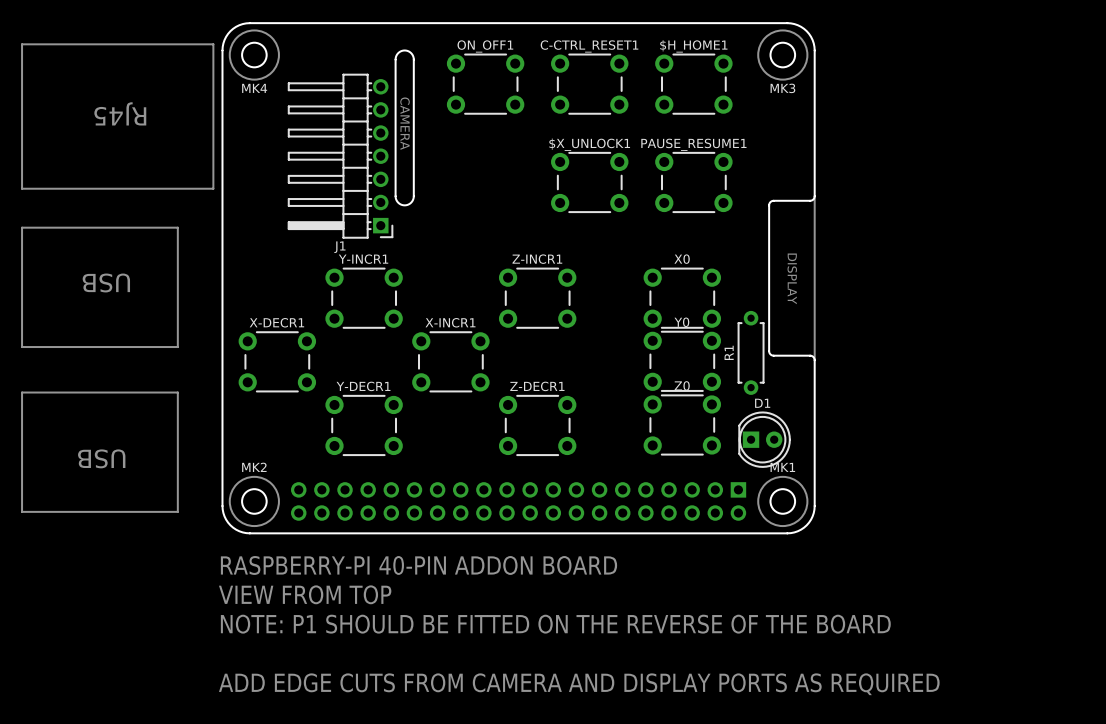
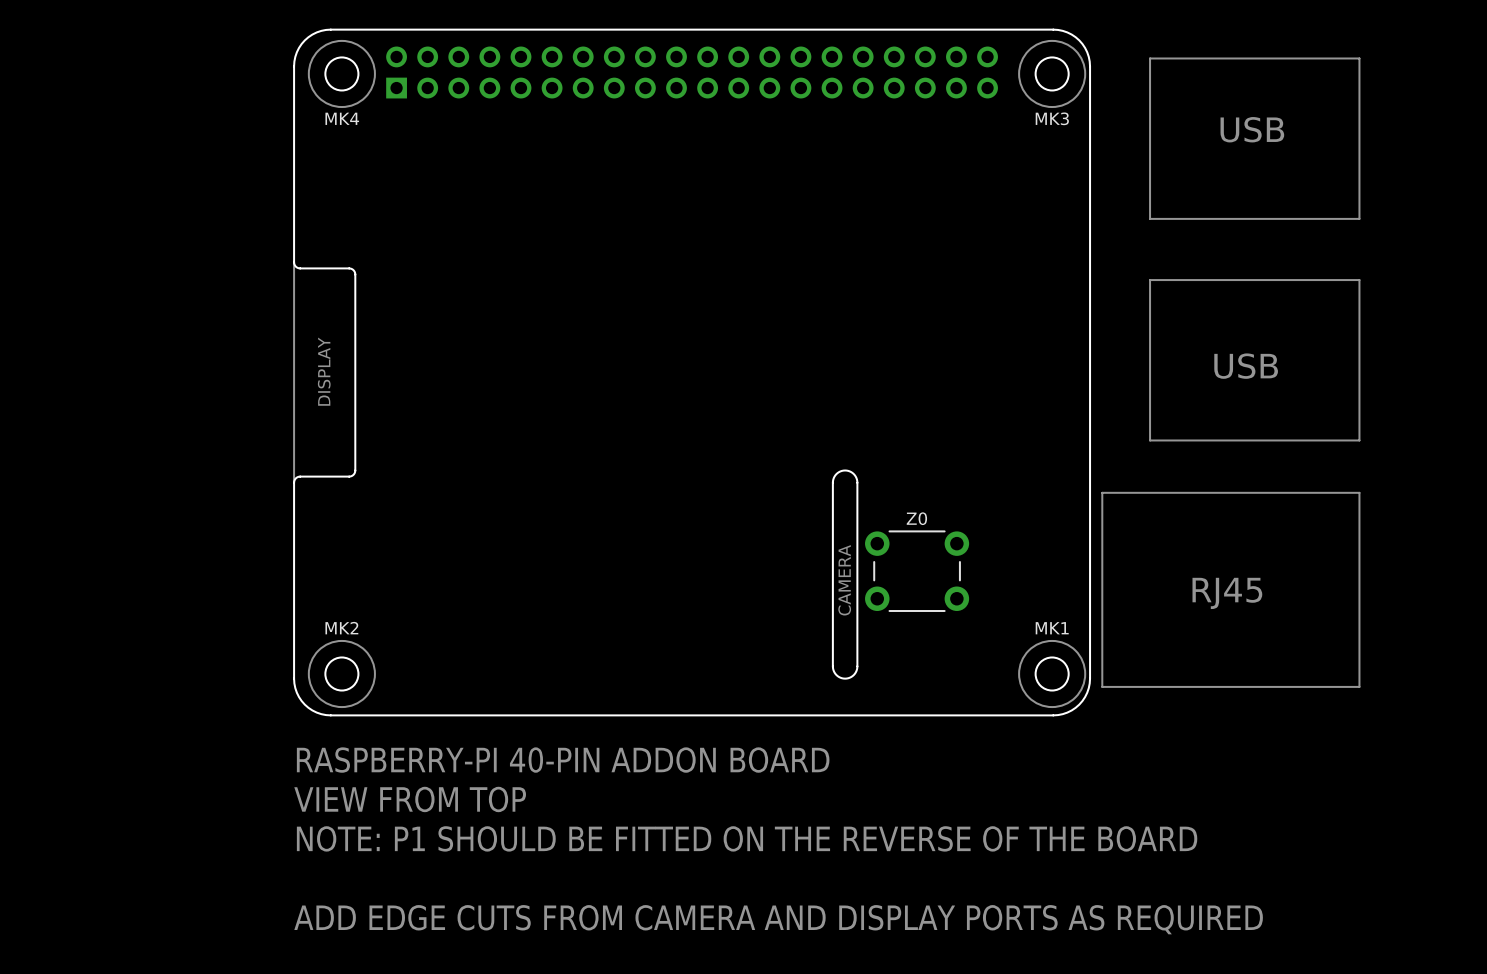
line: none -> (1150, 58) (1150, 218) (1359, 218) (1359, 58) (1150, 58)
line: (22, 44) (22, 188) (213, 188) (213, 44) (22, 44) -> none
part: none -> (692, 72)
board edge: (395, 59) (395, 197) (399, 203) (405, 205) (411, 201) (413, 196) (413, 58) (411, 53) (404, 50) (398, 53) (395, 59) -> none
ON_OFF1: (485, 84) -> none
C-CTRL_RESET1: (589, 84) -> none
$H_HOME1: (693, 84) -> none
text: none -> USB (1252, 129)
text: RJ45 (120, 113) -> none
text: CAMERA (405, 123) -> none
J1: (340, 156) -> none
$X_UNLOCK1: (589, 182) -> none
PAUSE_RESUME1: (693, 182) -> none
line: none -> (294, 262) (294, 482)
line: (814, 196) (814, 360) -> none
board edge: (810, 200) (773, 200) (769, 205) (769, 352) (773, 355) (810, 355) (814, 359) (814, 509) (809, 522) (801, 529) (787, 533) (249, 533) (236, 529) (226, 519) (222, 506) (222, 50) (226, 36) (236, 26) (249, 23) (794, 24) (806, 31) (814, 46) (814, 196) (810, 200) -> (330, 29) (316, 32) (308, 37) (298, 48) (294, 61) (294, 262) (295, 266) (299, 268) (349, 268) (355, 272) (355, 470) (353, 474) (349, 476) (299, 476) (294, 481) (294, 678) (296, 692) (304, 704) (316, 712) (330, 715) (1053, 715) (1067, 712) (1079, 704) (1087, 692) (1090, 678) (1090, 66) (1087, 52) (1079, 40) (1067, 32) (1053, 29) (330, 29)
line: none -> (1150, 280) (1359, 280) (1359, 440) (1150, 440) (1150, 280)
line: (22, 227) (177, 227) (177, 347) (22, 347) (22, 227) -> none
text: none -> USB (1246, 366)
text: none -> DISPLAY (324, 371)
text: DISPLAY (792, 278) -> none
text: USB (106, 282) -> none
Y-INCR1: (364, 298) -> none
Z-INCR1: (537, 298) -> none
X0: (682, 298) -> none
R1: (751, 352) -> none
board edge: none -> (832, 482) (832, 668) (837, 676) (846, 678) (854, 673) (857, 666) (857, 481) (852, 473) (843, 470) (835, 475) (832, 482)
X-DECR1: (277, 361) -> none
X-INCR1: (450, 361) -> none
Y0: (682, 361) -> none
line: none -> (1102, 492) (1102, 686) (1359, 686) (1359, 492) (1102, 492)
line: (22, 392) (22, 511) (177, 511) (177, 392) (22, 392) -> none
Y-DECR1: (364, 425) -> none
Z-DECR1: (537, 425) -> none
text: none -> CAMERA (844, 580)
D1: (764, 439) -> none
text: none -> RJ45 (1227, 593)
text: USB (101, 458) -> none
part: (518, 501) -> none

